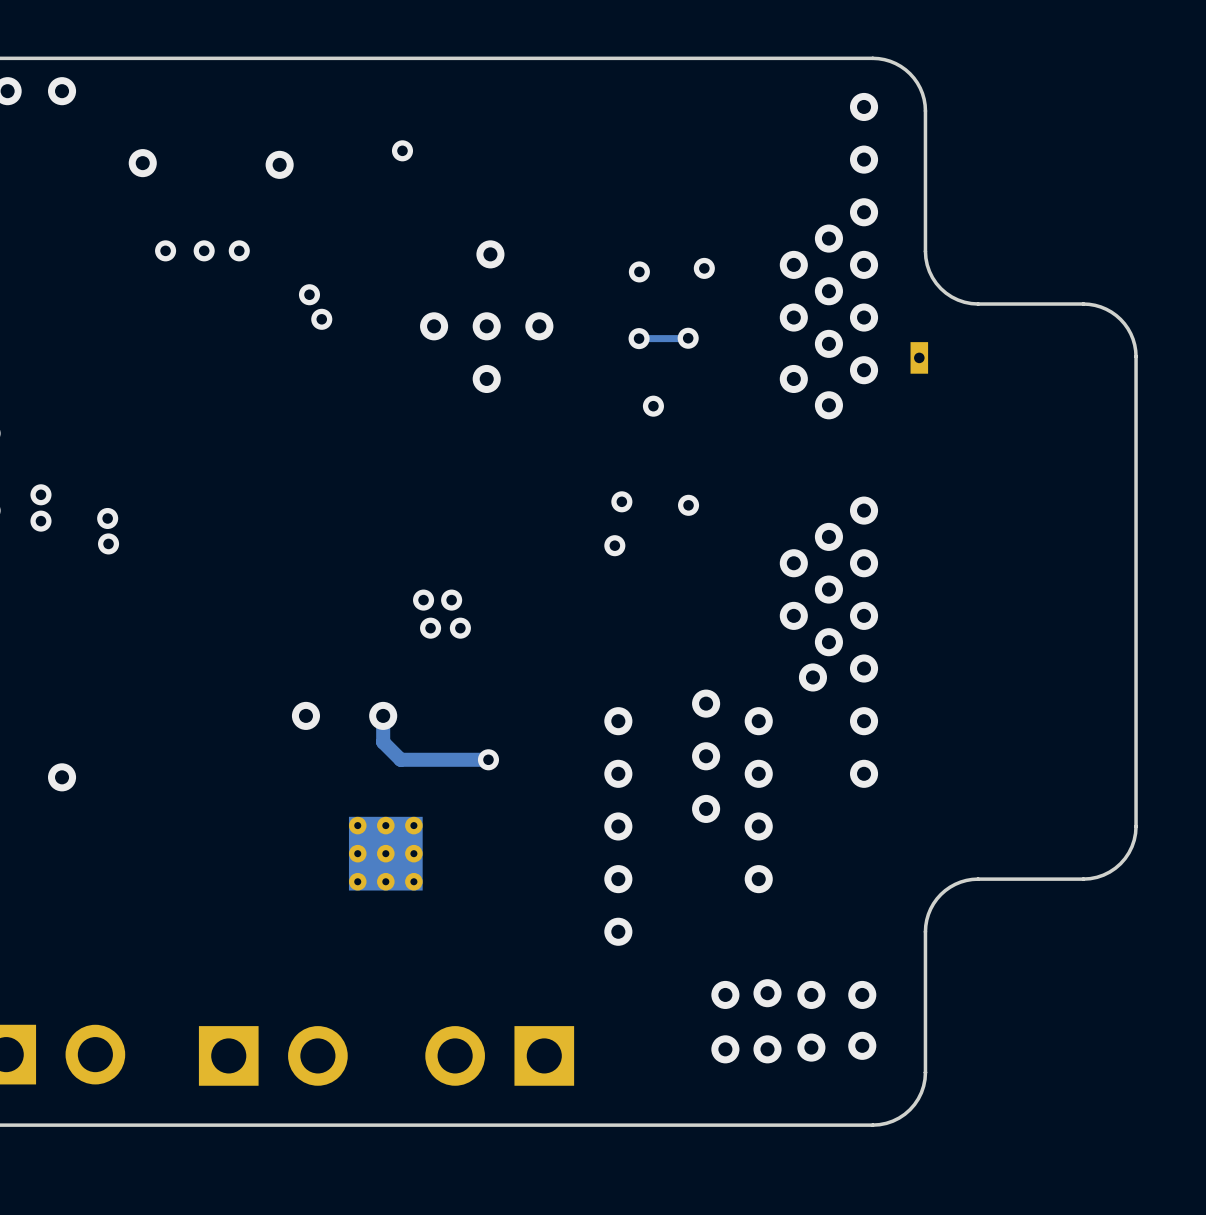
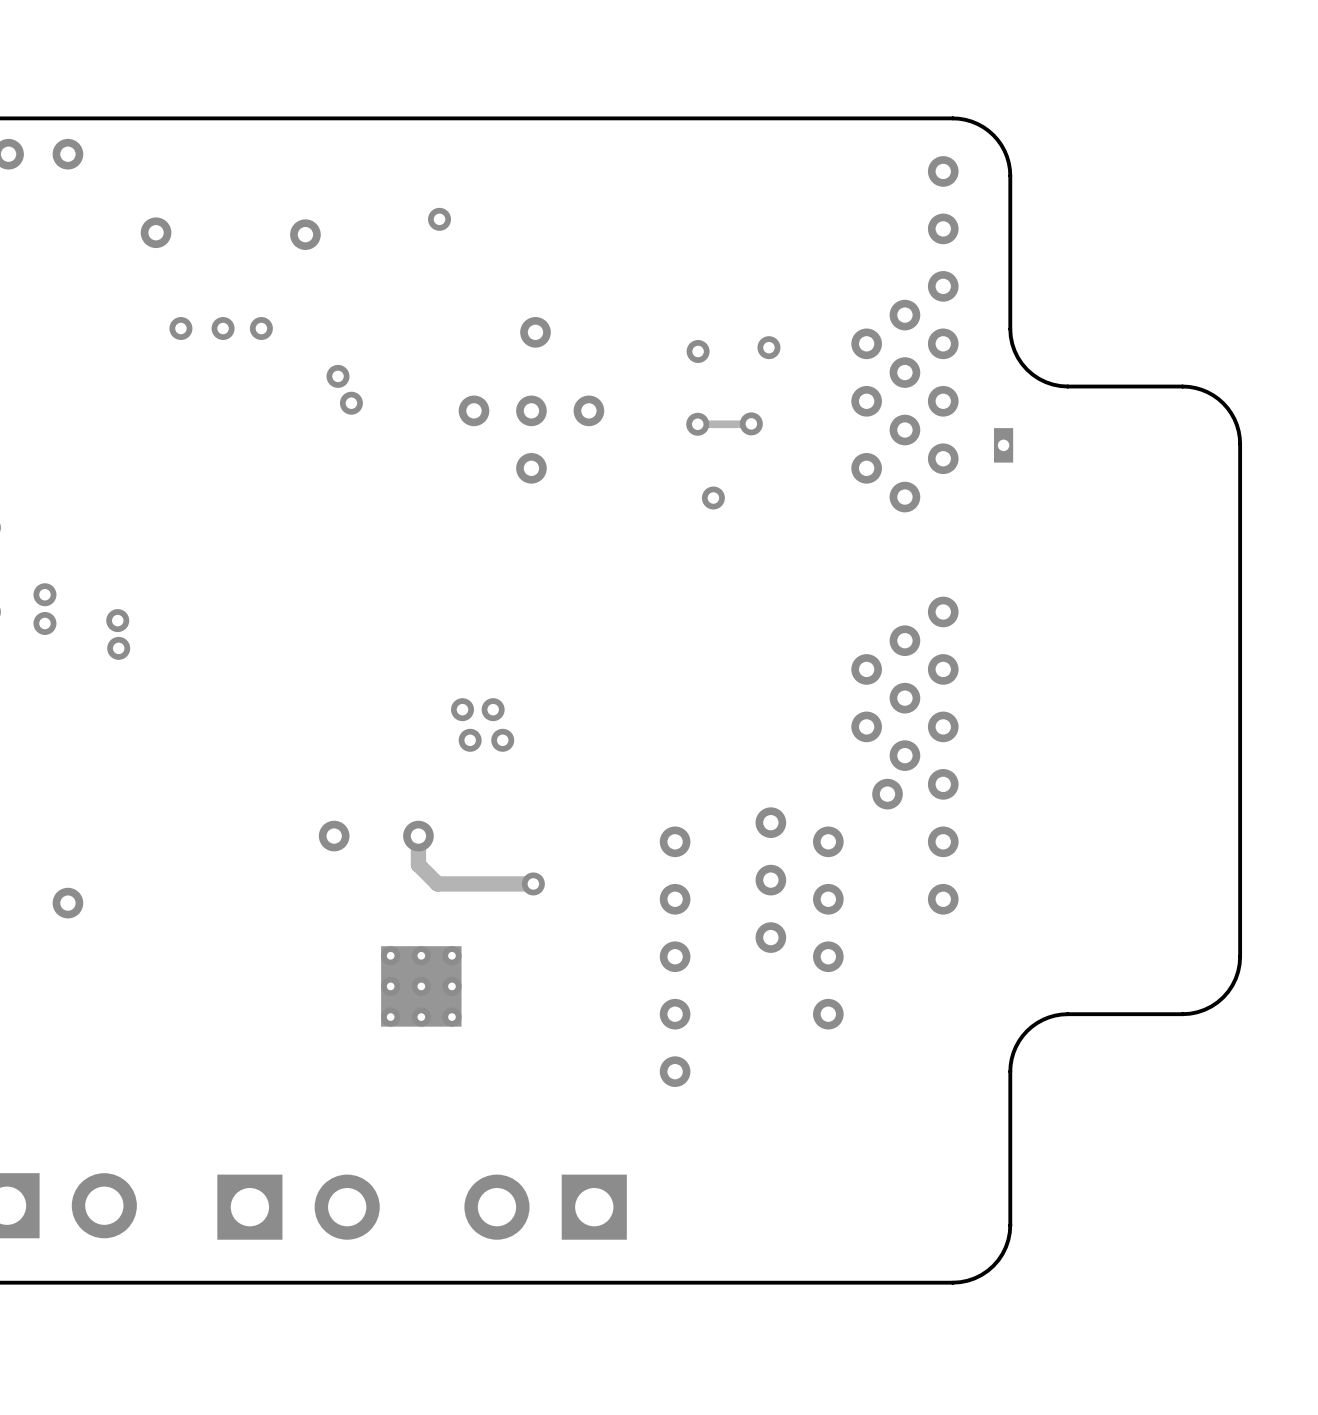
via: (621, 501) -> none
via: (688, 505) -> none
via: (614, 545) -> none
via: (767, 993) -> none
via: (725, 994) -> none
via: (811, 994) -> none
via: (862, 994) -> none
via: (862, 1045) -> none
via: (811, 1047) -> none
via: (725, 1049) -> none
via: (767, 1049) -> none

